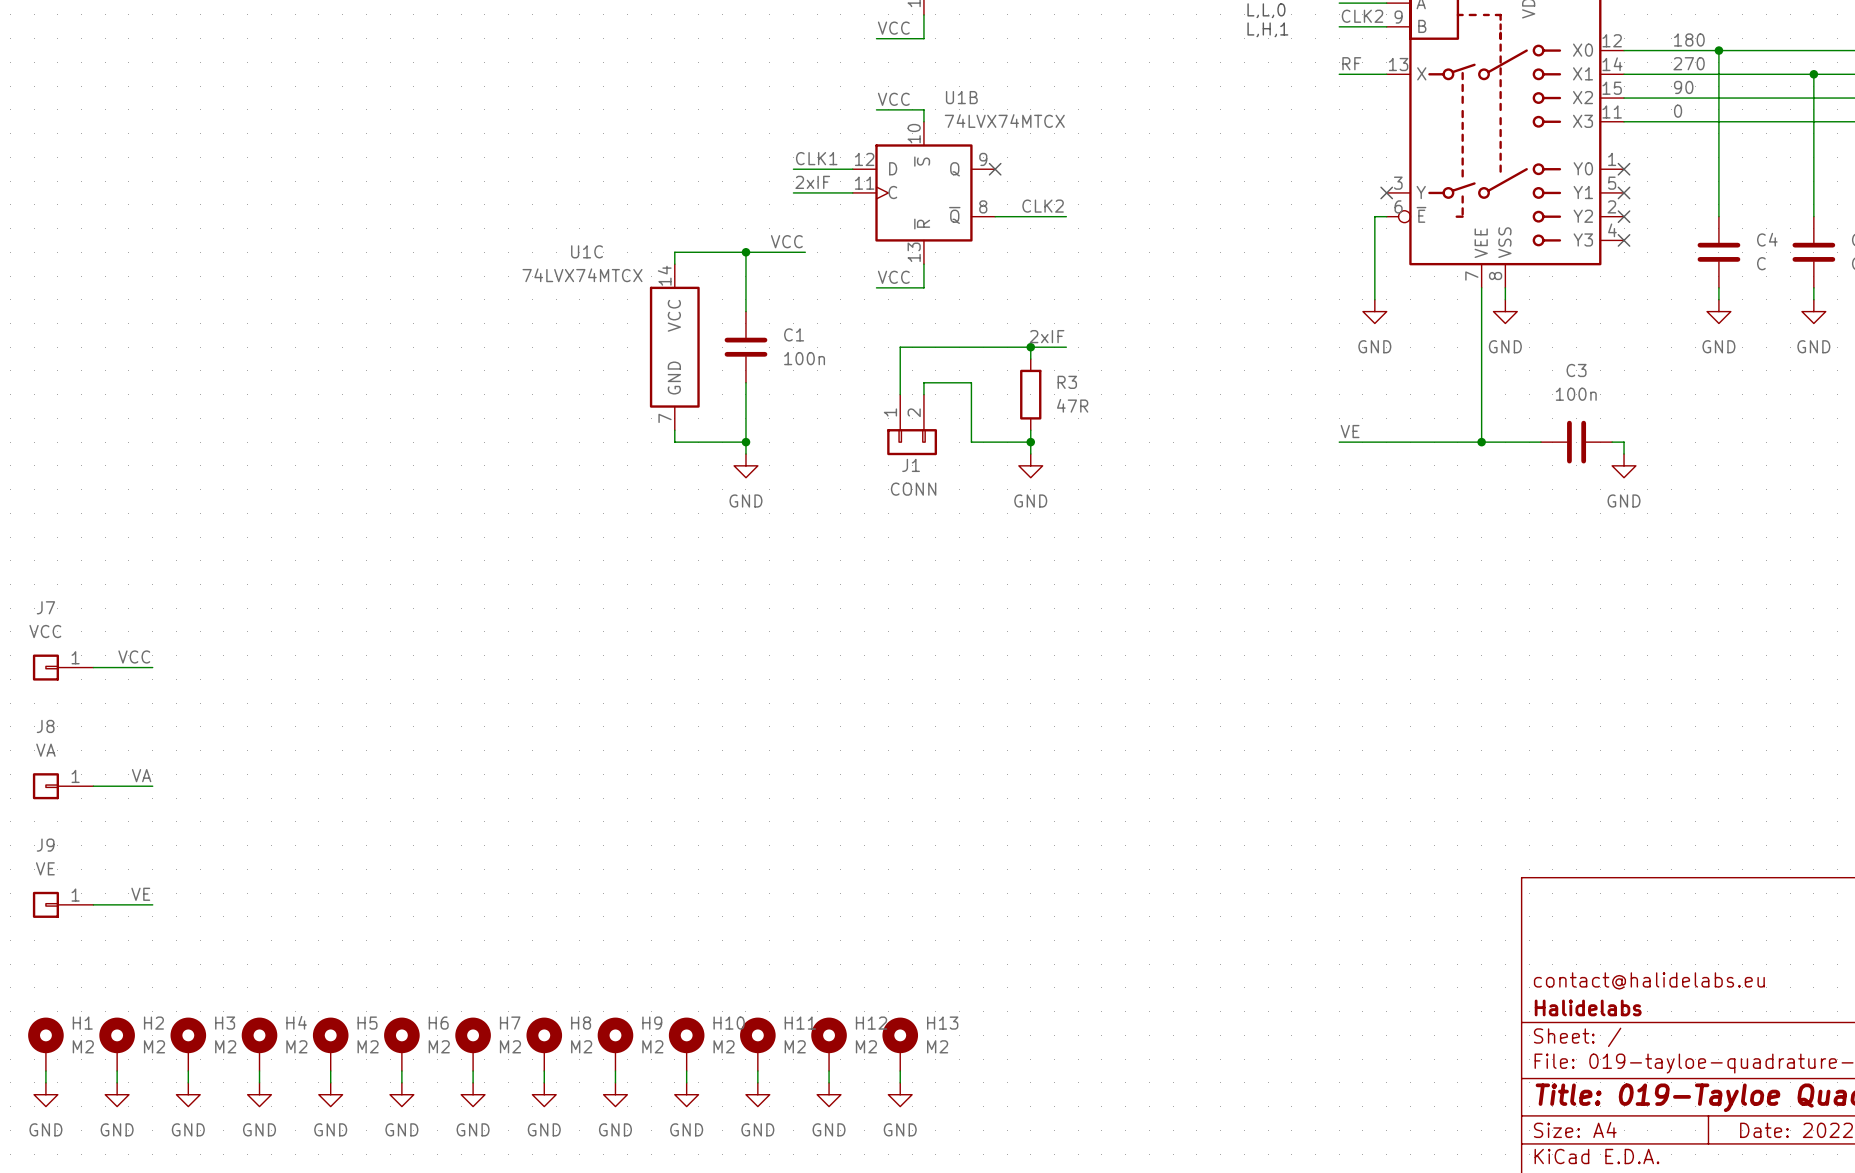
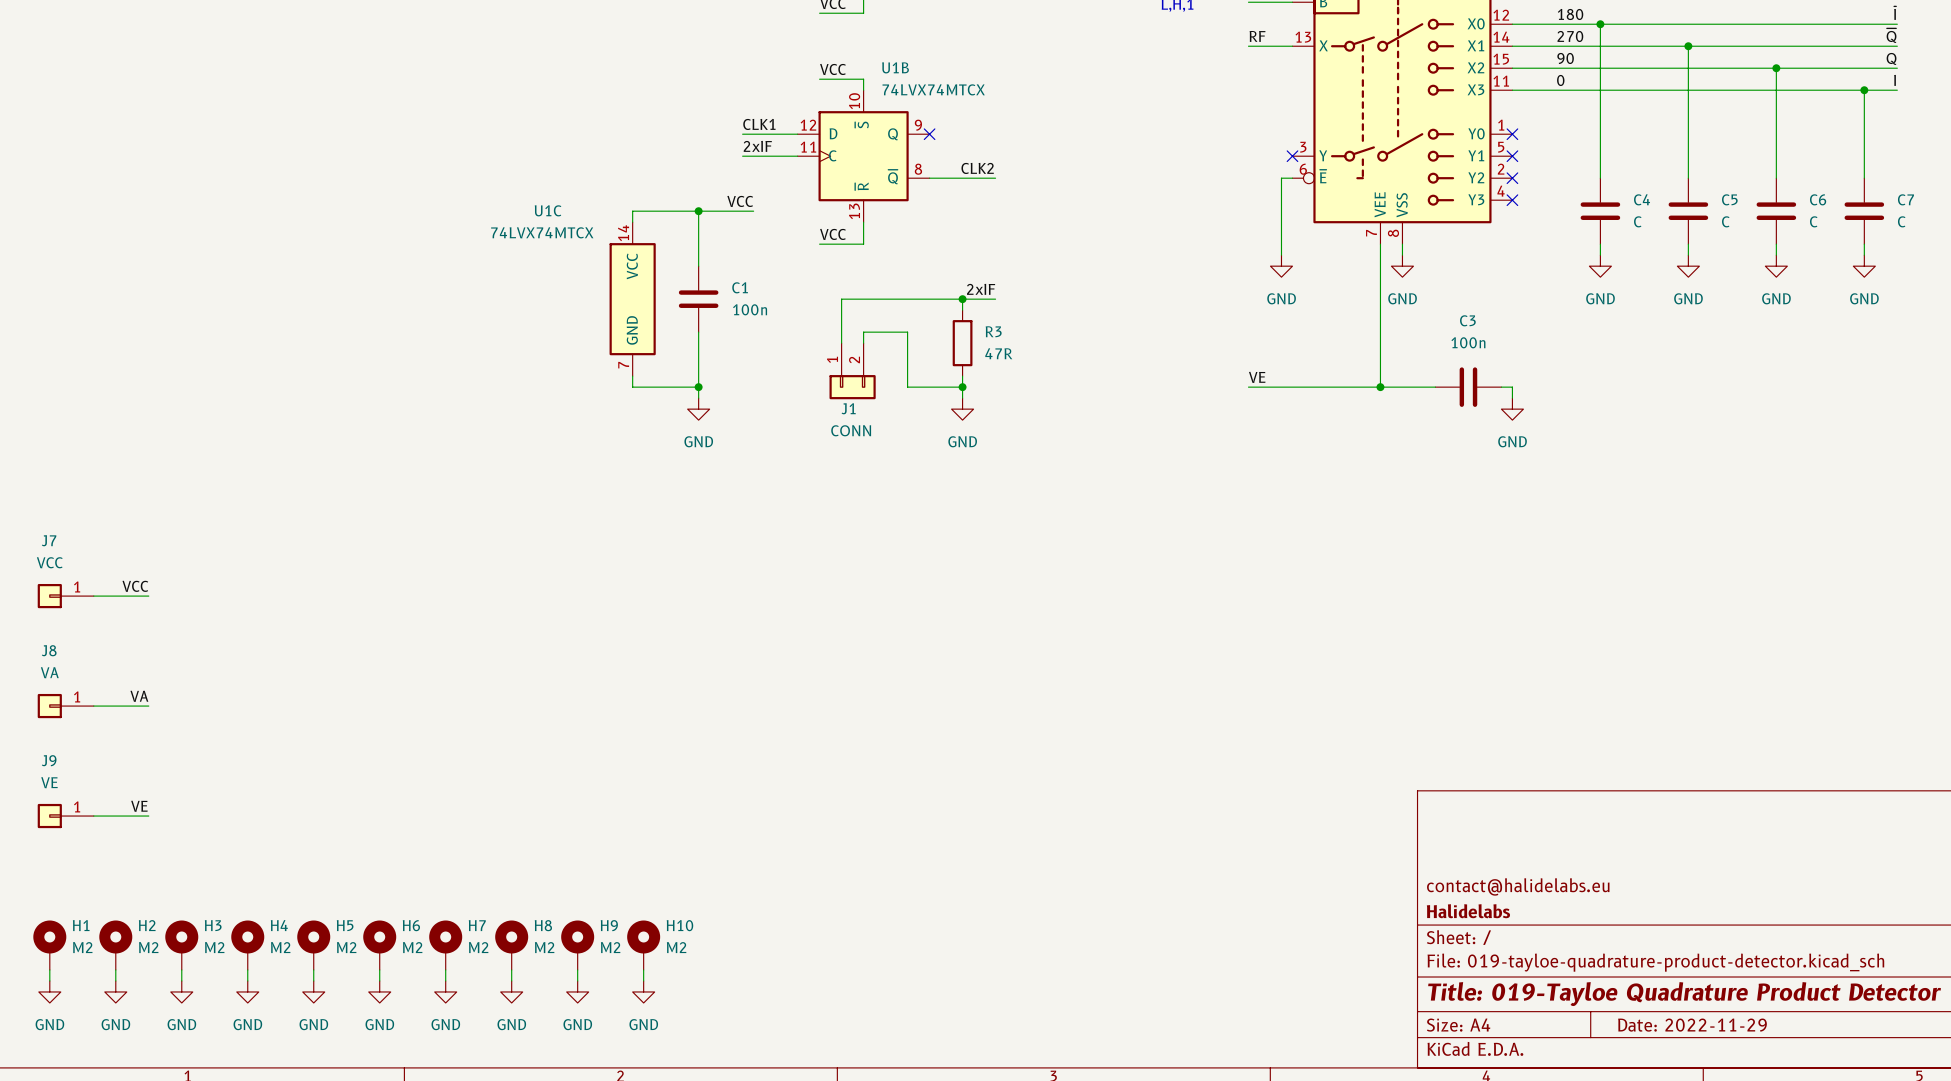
H11: M2 (757, 1044) -> none
H12: M2 (829, 1044) -> none
H13: M2 (900, 1044) -> none
wire: (757, 1070) (757, 1082) -> none
wire: (829, 1070) (829, 1082) -> none
wire: (900, 1070) (900, 1082) -> none
power symbol: GND (757, 1094) -> none
power symbol: GND (829, 1094) -> none
power symbol: GND (900, 1094) -> none

